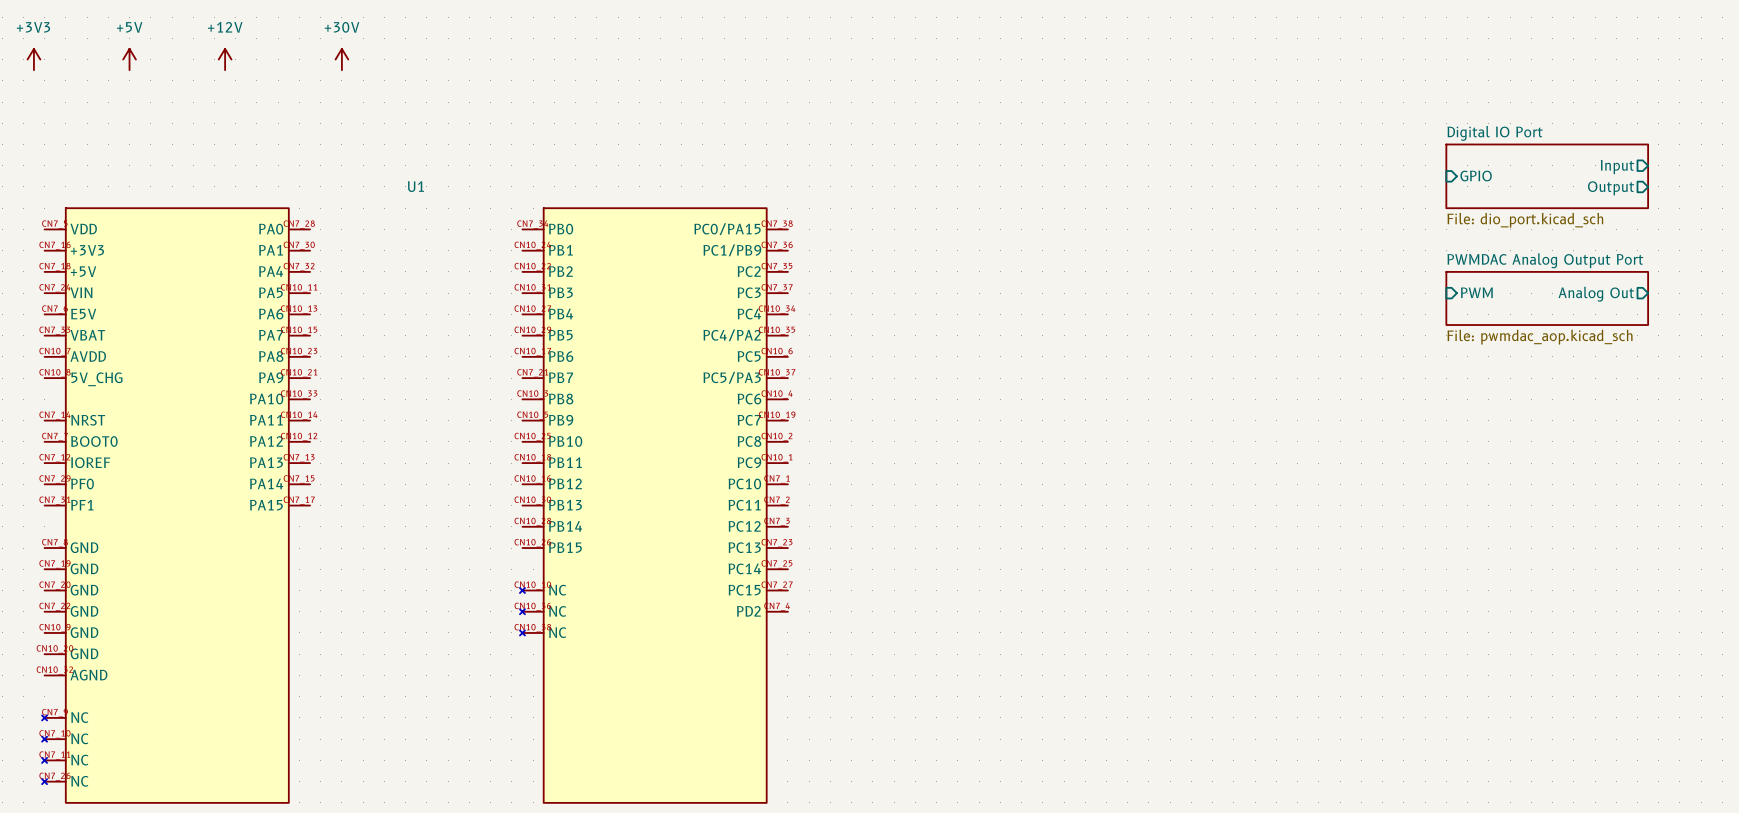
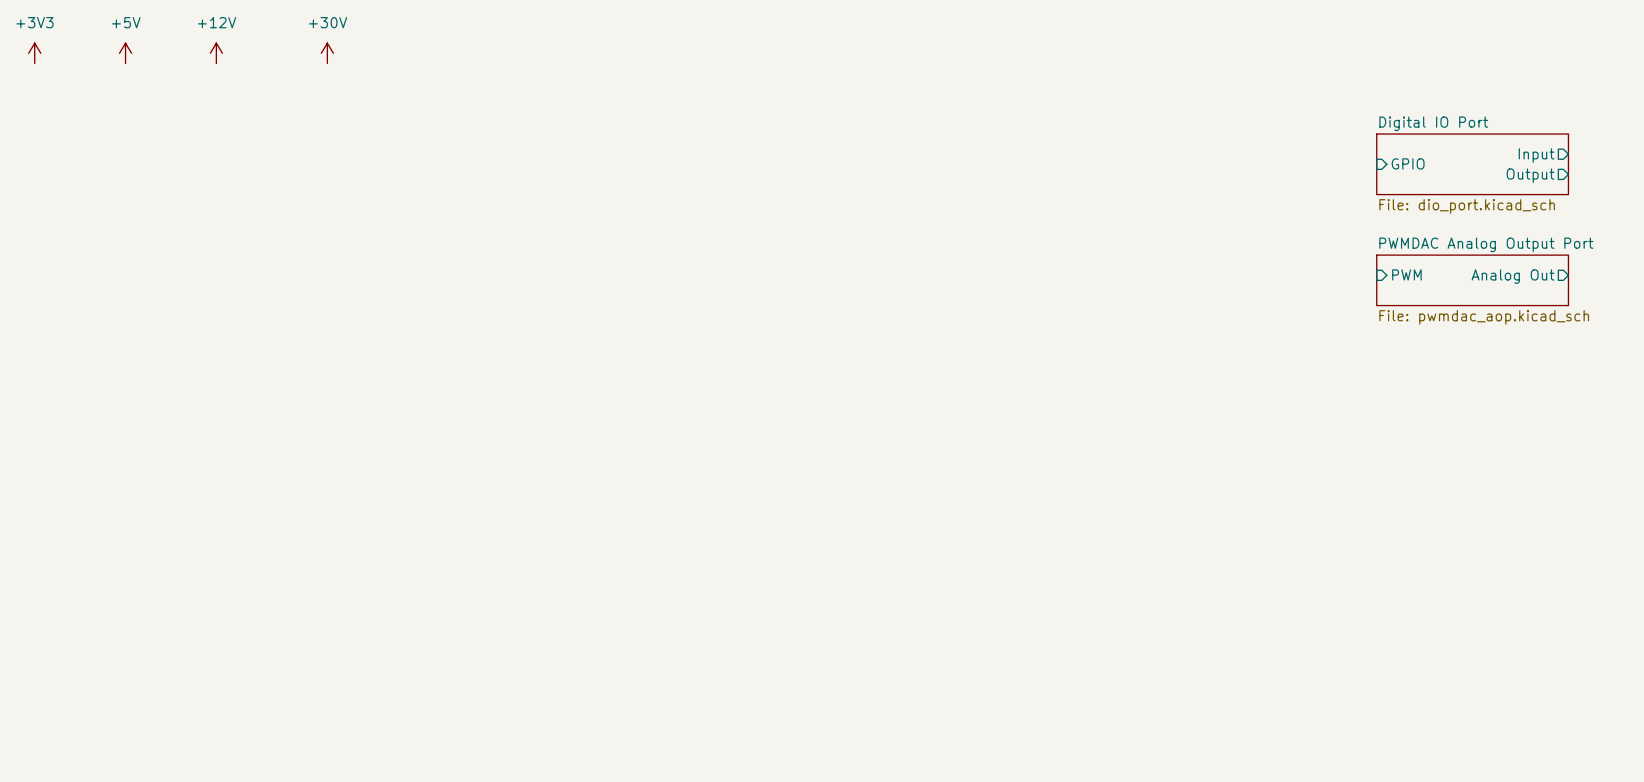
U1: (415, 505) -> none

